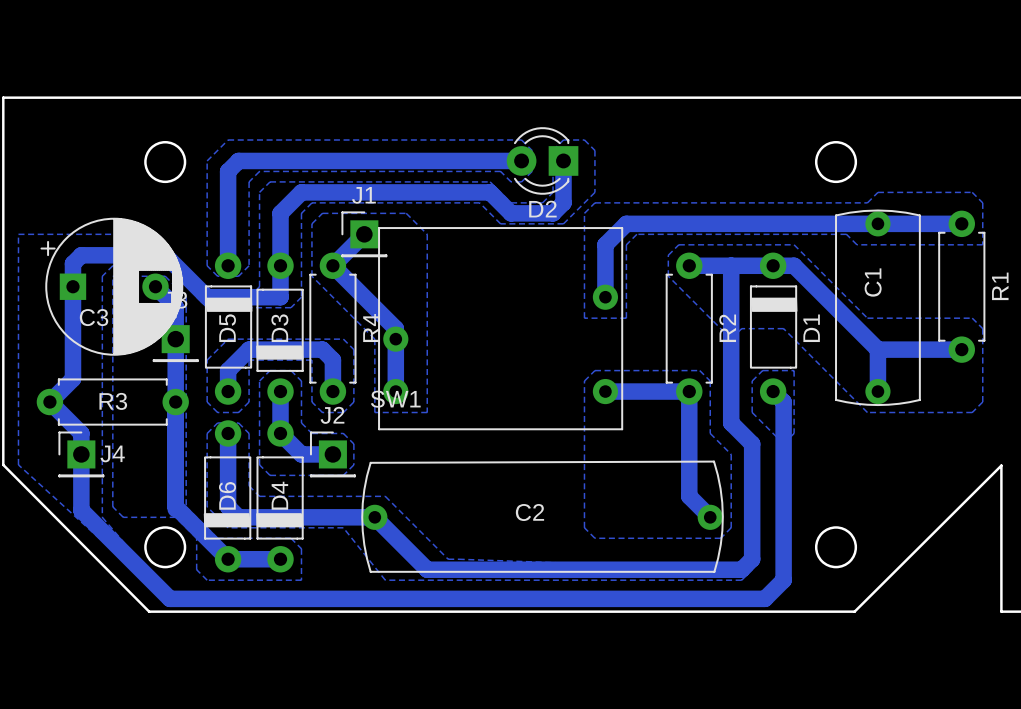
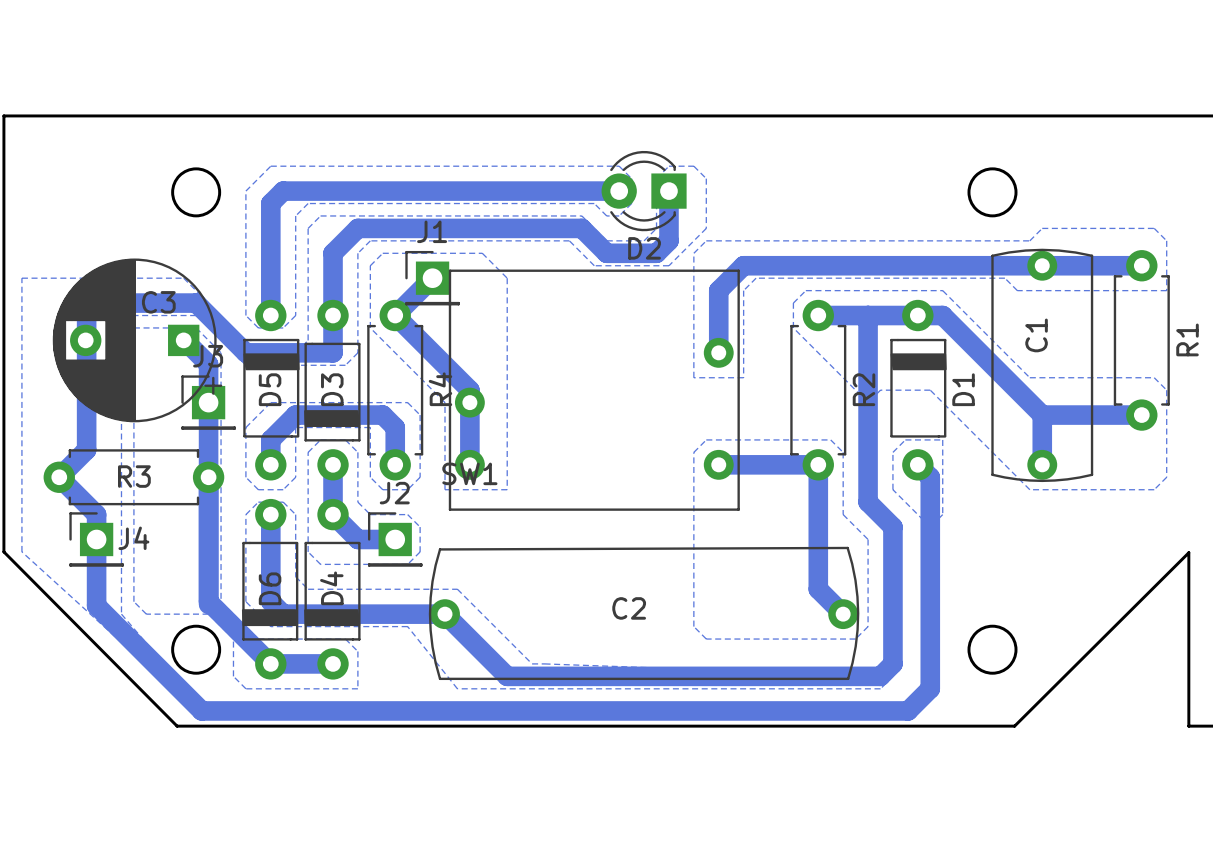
C3 rotation: 0° (111, 286) -> 180° (137, 340)

